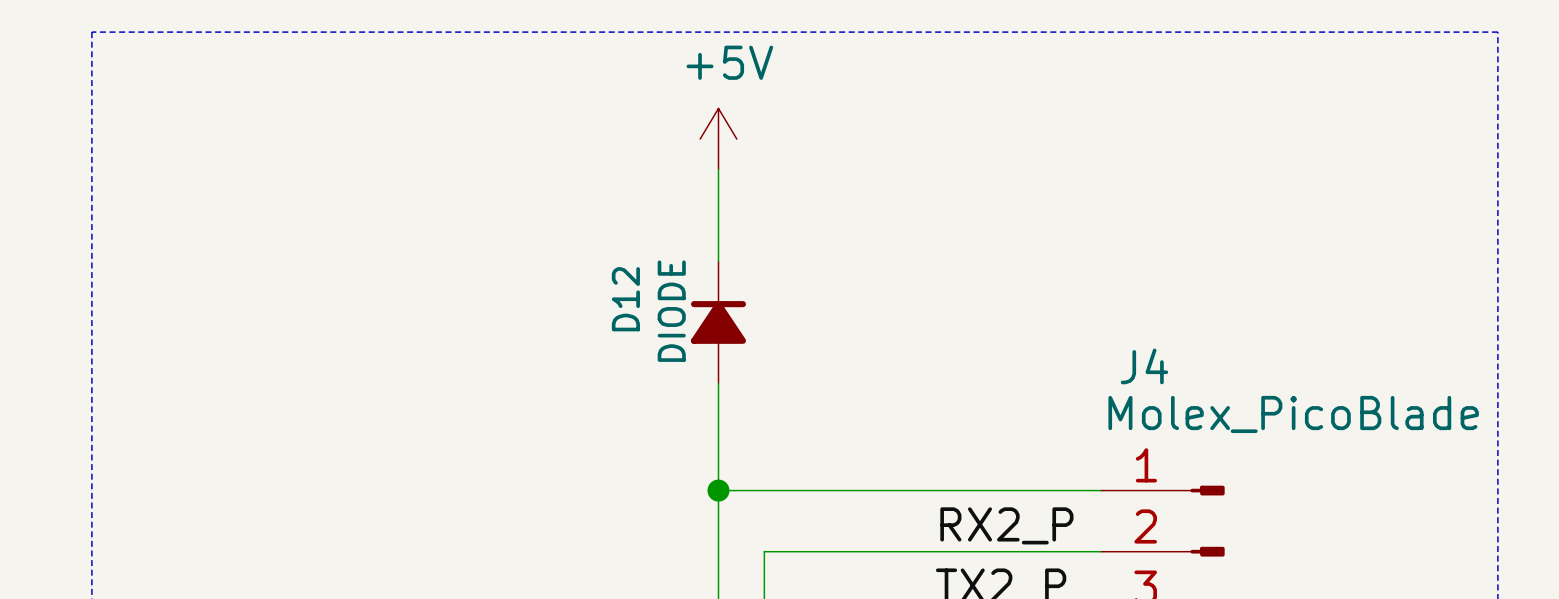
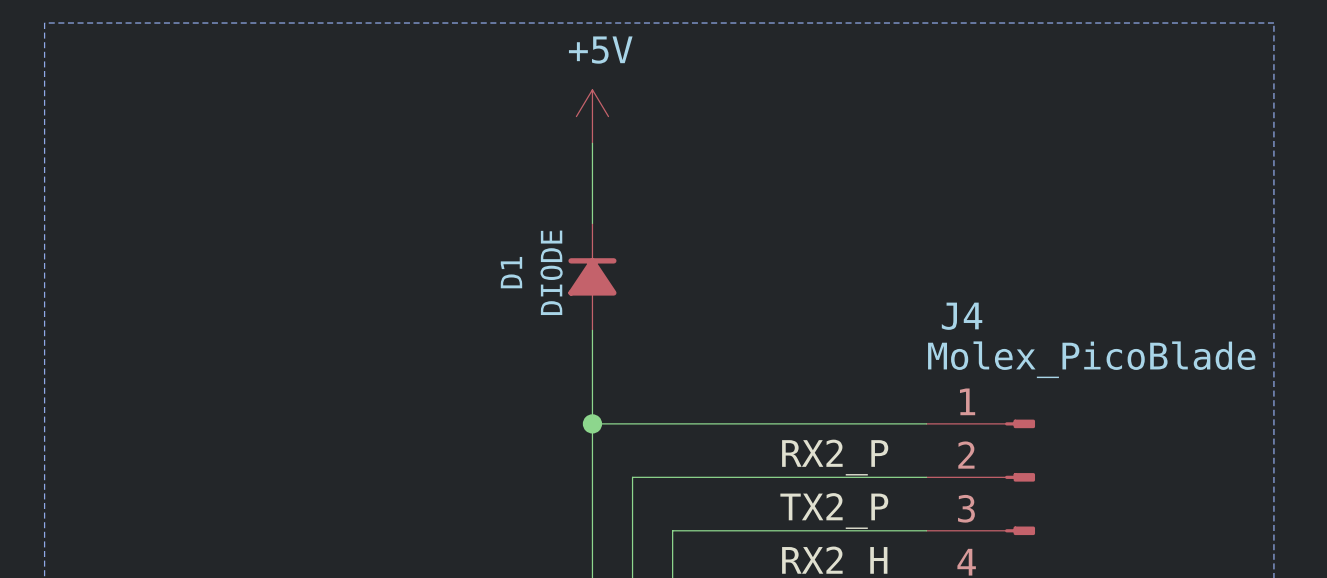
D12 name: D12 (625, 299) -> D1 (511, 272)

